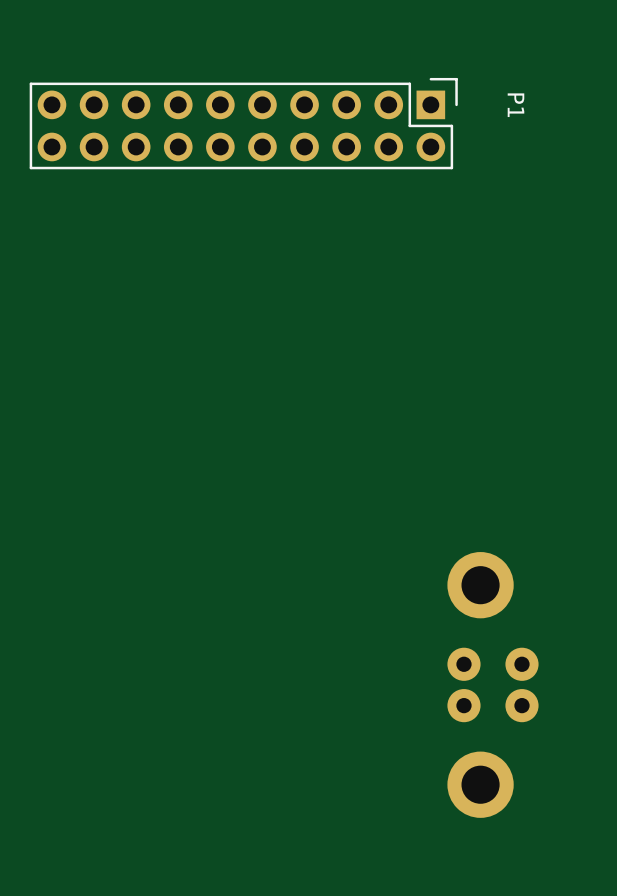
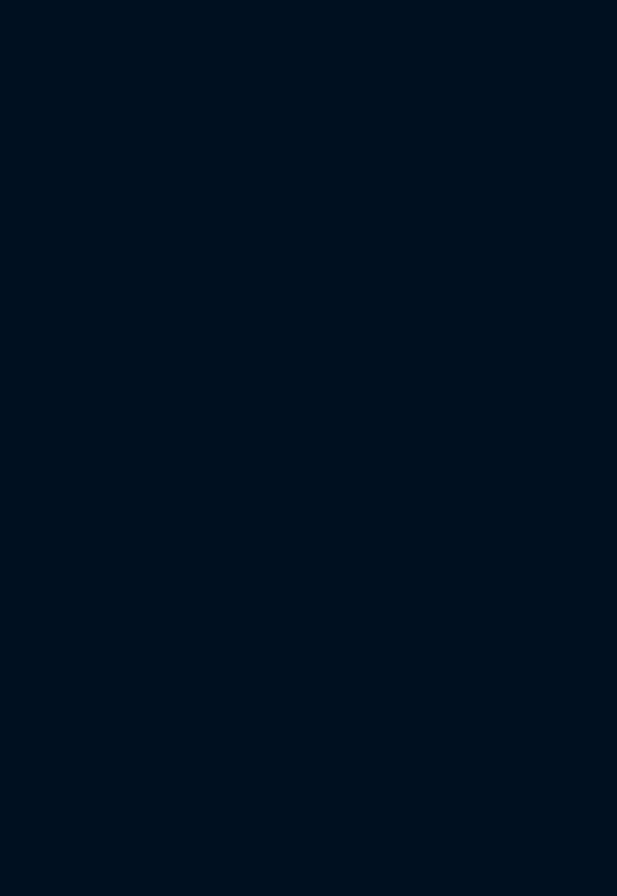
P1: (243, 123) -> none
part: (492, 684) -> none

